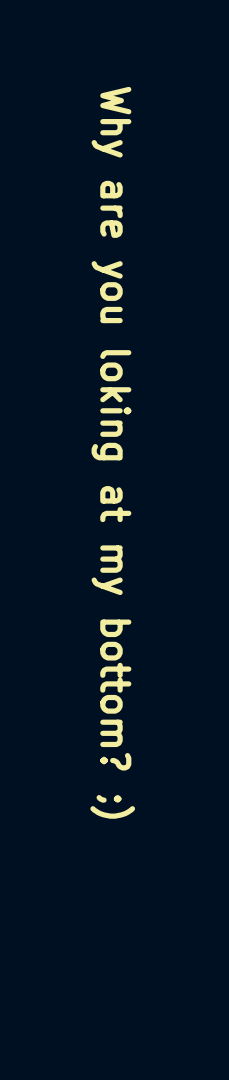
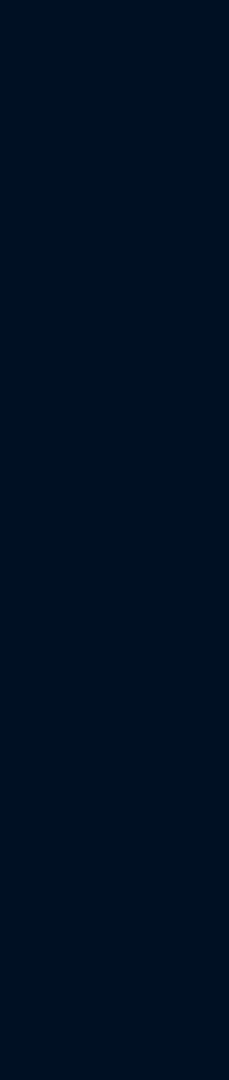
text: Why are you loking at my bottom? ;) (112, 452) -> none

